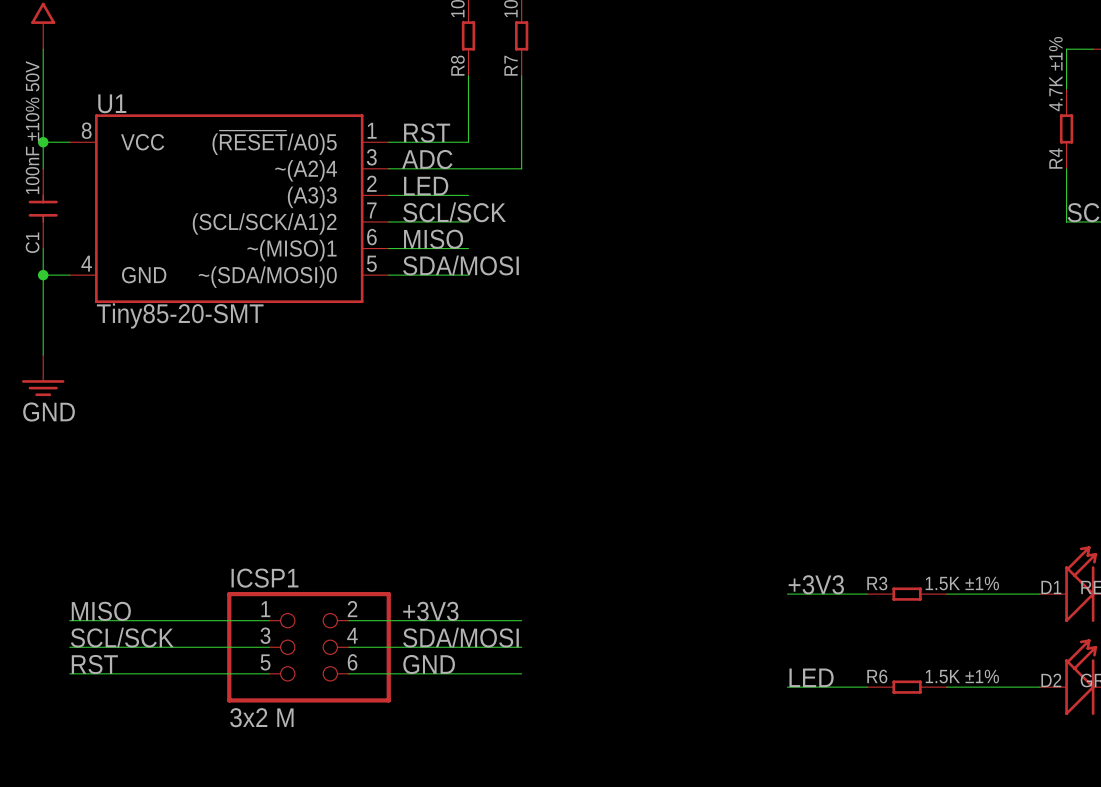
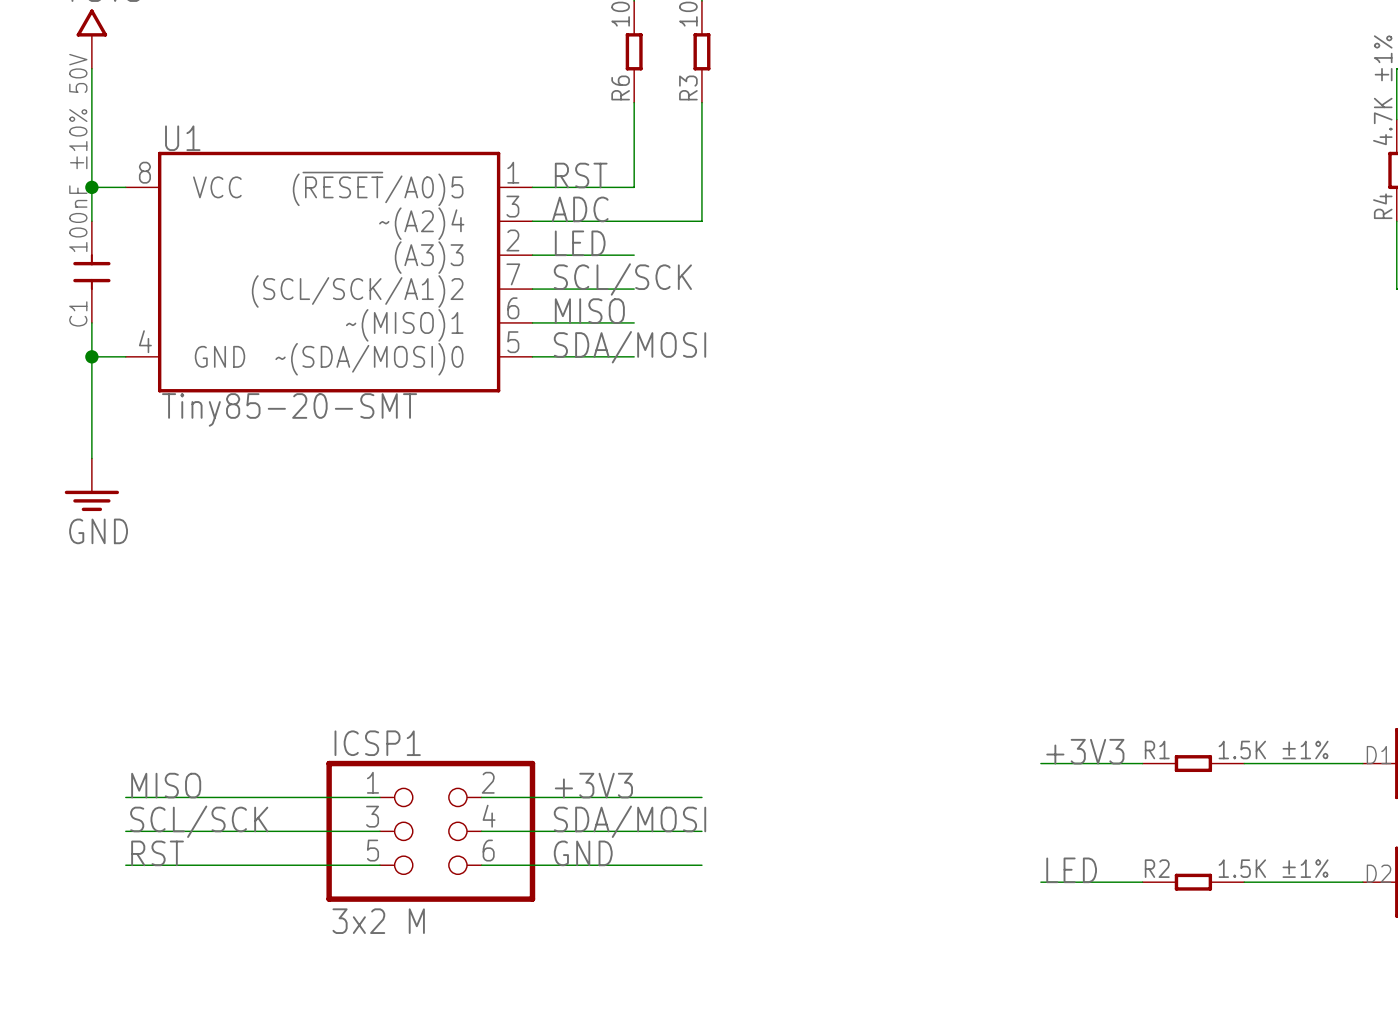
R8 name: R8 (457, 65) -> R6 (620, 87)
R7 name: R7 (511, 65) -> R3 (688, 87)
R3 name: R3 (877, 583) -> R1 (1157, 750)
R6 name: R6 (877, 676) -> R2 (1157, 868)

